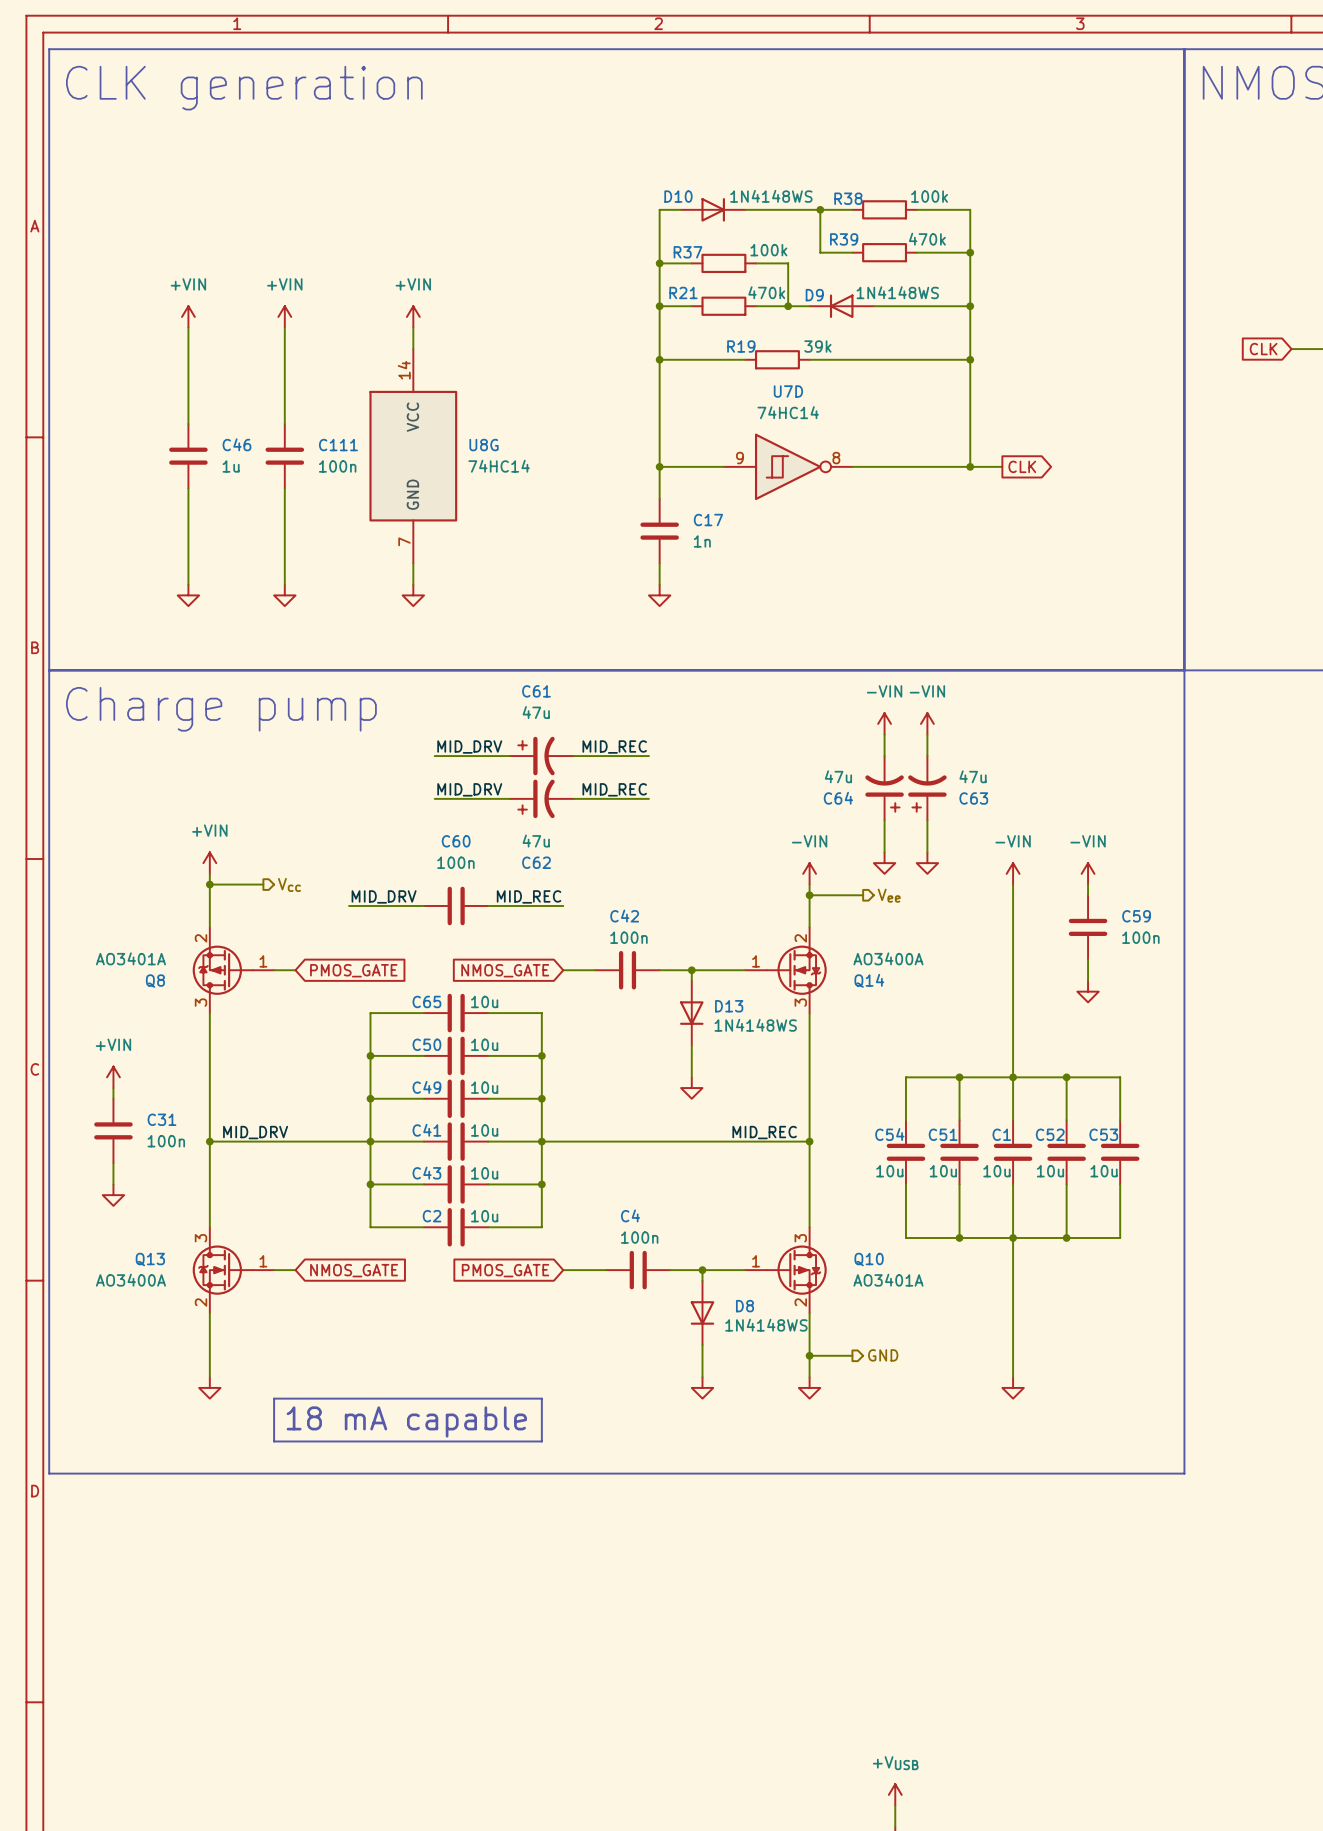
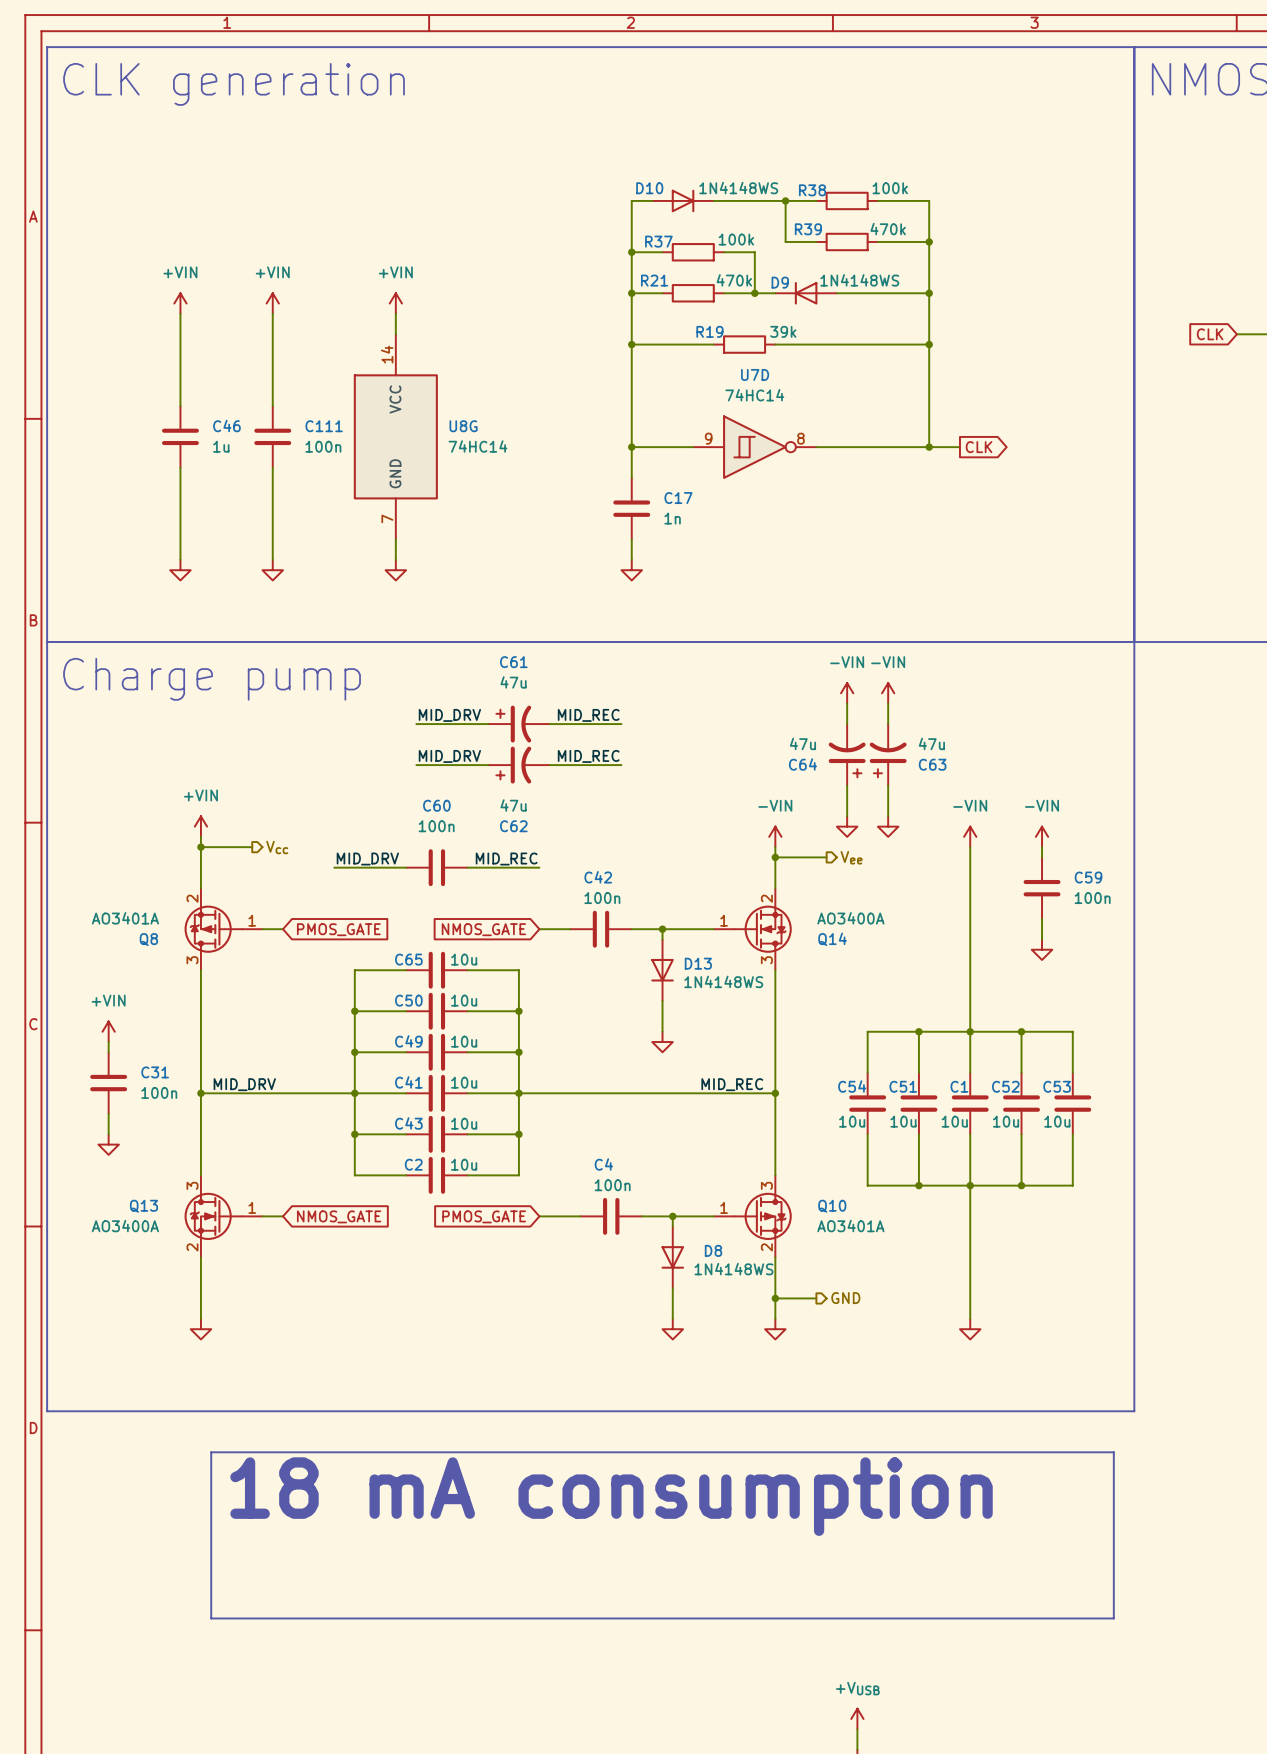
line: (274, 1398) (541, 1398) (541, 1441) (274, 1441) (274, 1398) -> none
text: 18 mA capable (406, 1421) -> none
line: none -> (211, 1452) (1113, 1452) (1113, 1618) (211, 1618) (211, 1452)
text: none -> 18 mA consumption (611, 1496)

